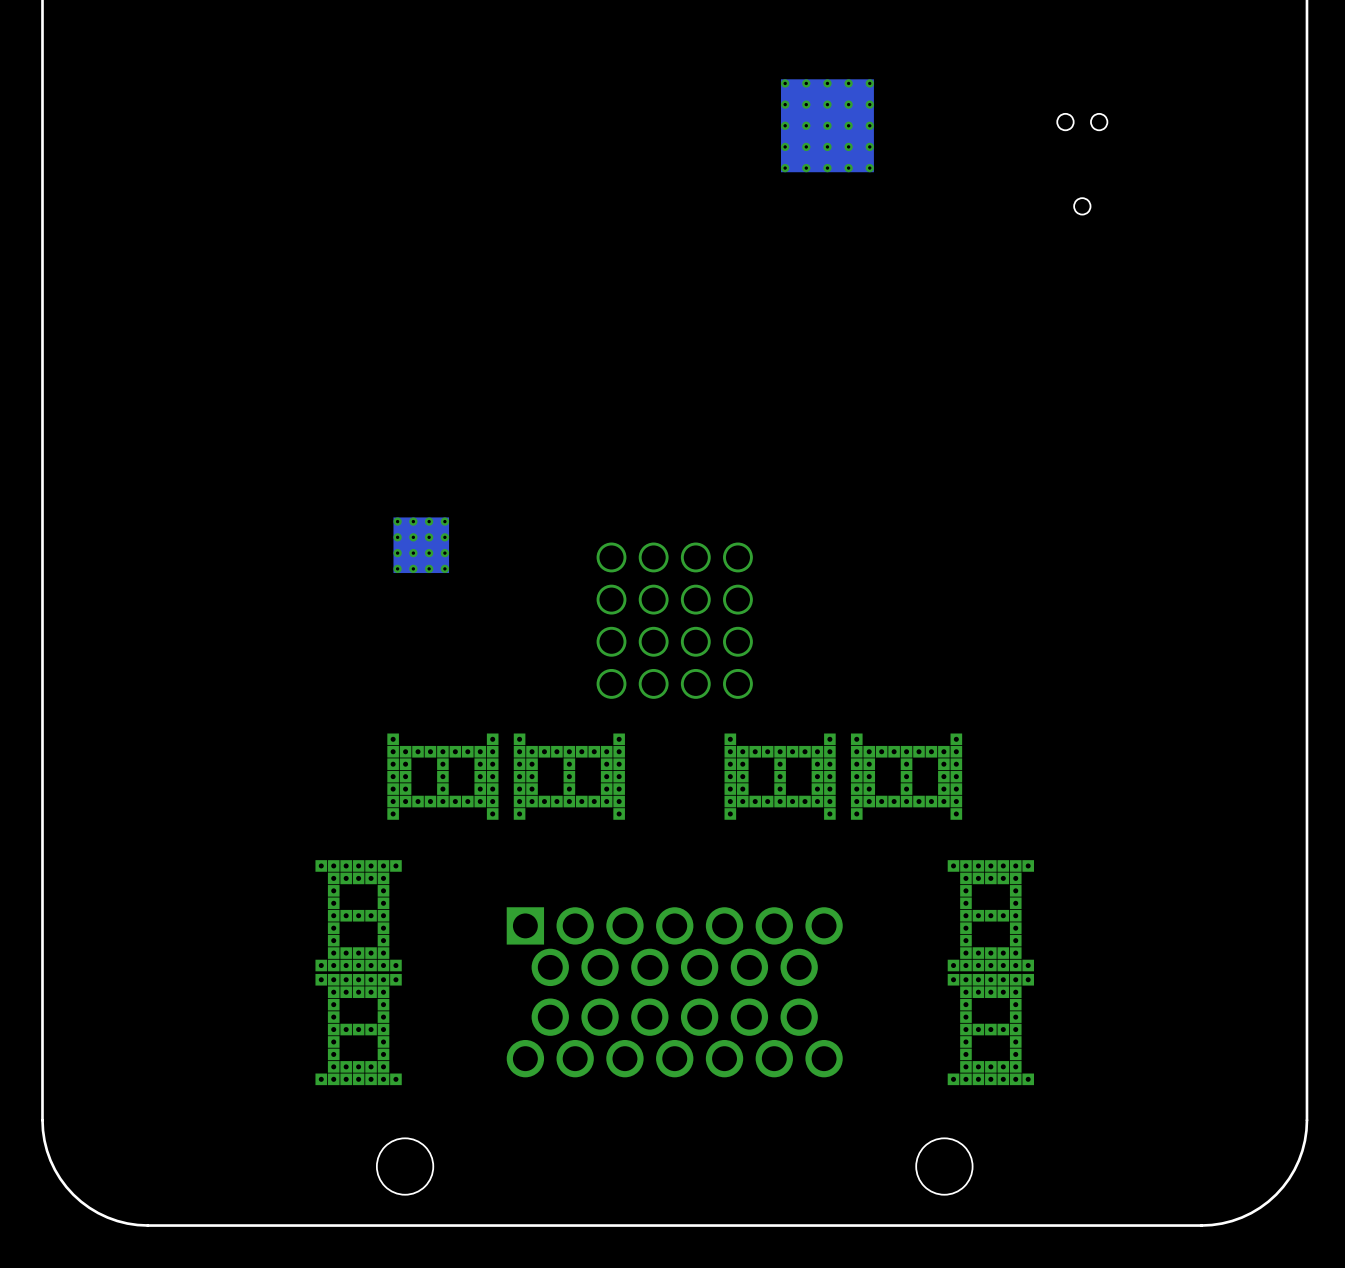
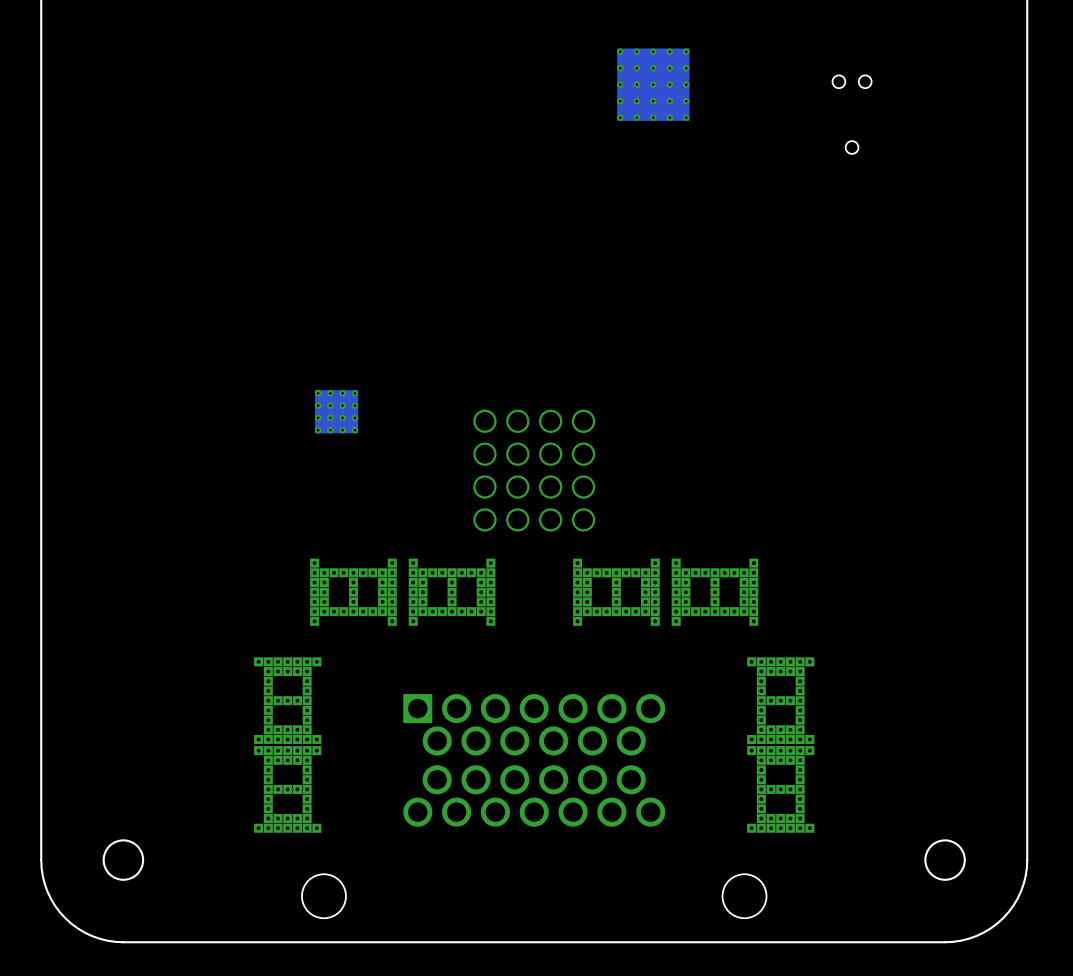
round board edge: none -> [102, 839, 145, 881]
round board edge: none -> [924, 839, 966, 881]

